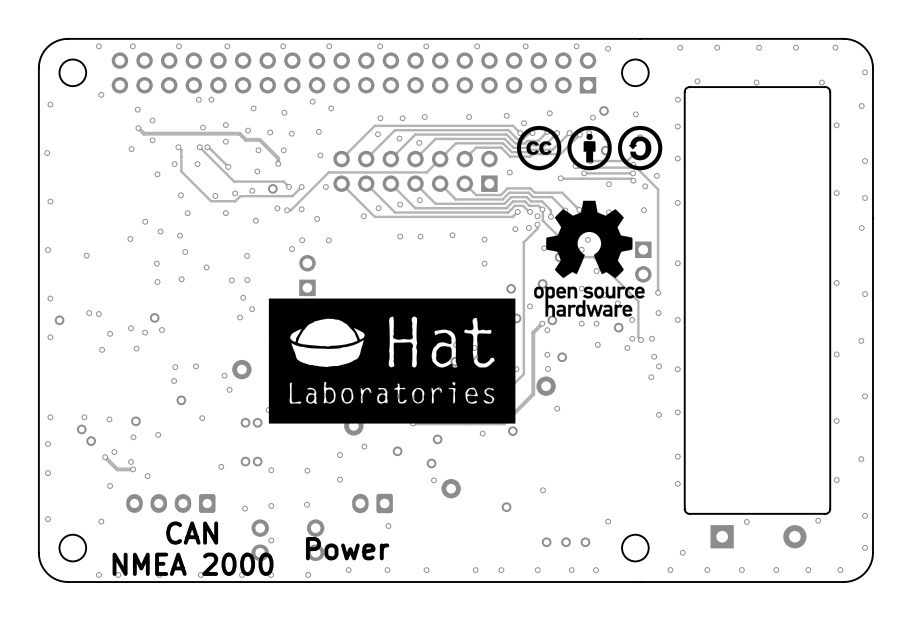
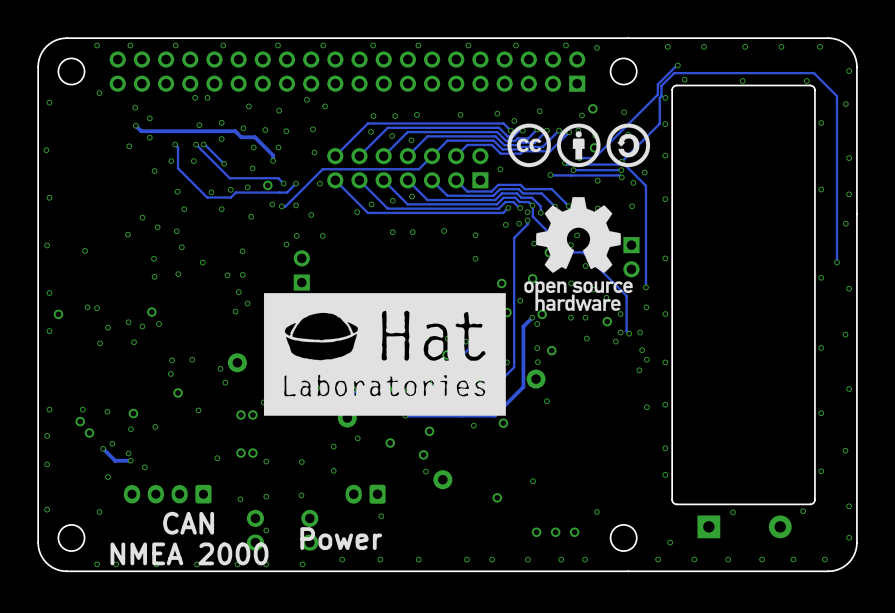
via: none -> (677, 65)
track: (633, 154) (627, 161) (605, 161) -> (677, 65) (657, 84) (657, 94) (594, 158)
track: none -> (621, 161) (659, 123) (661, 85) (674, 73) (813, 73) (836, 96) (836, 262)
via: none -> (836, 262)

